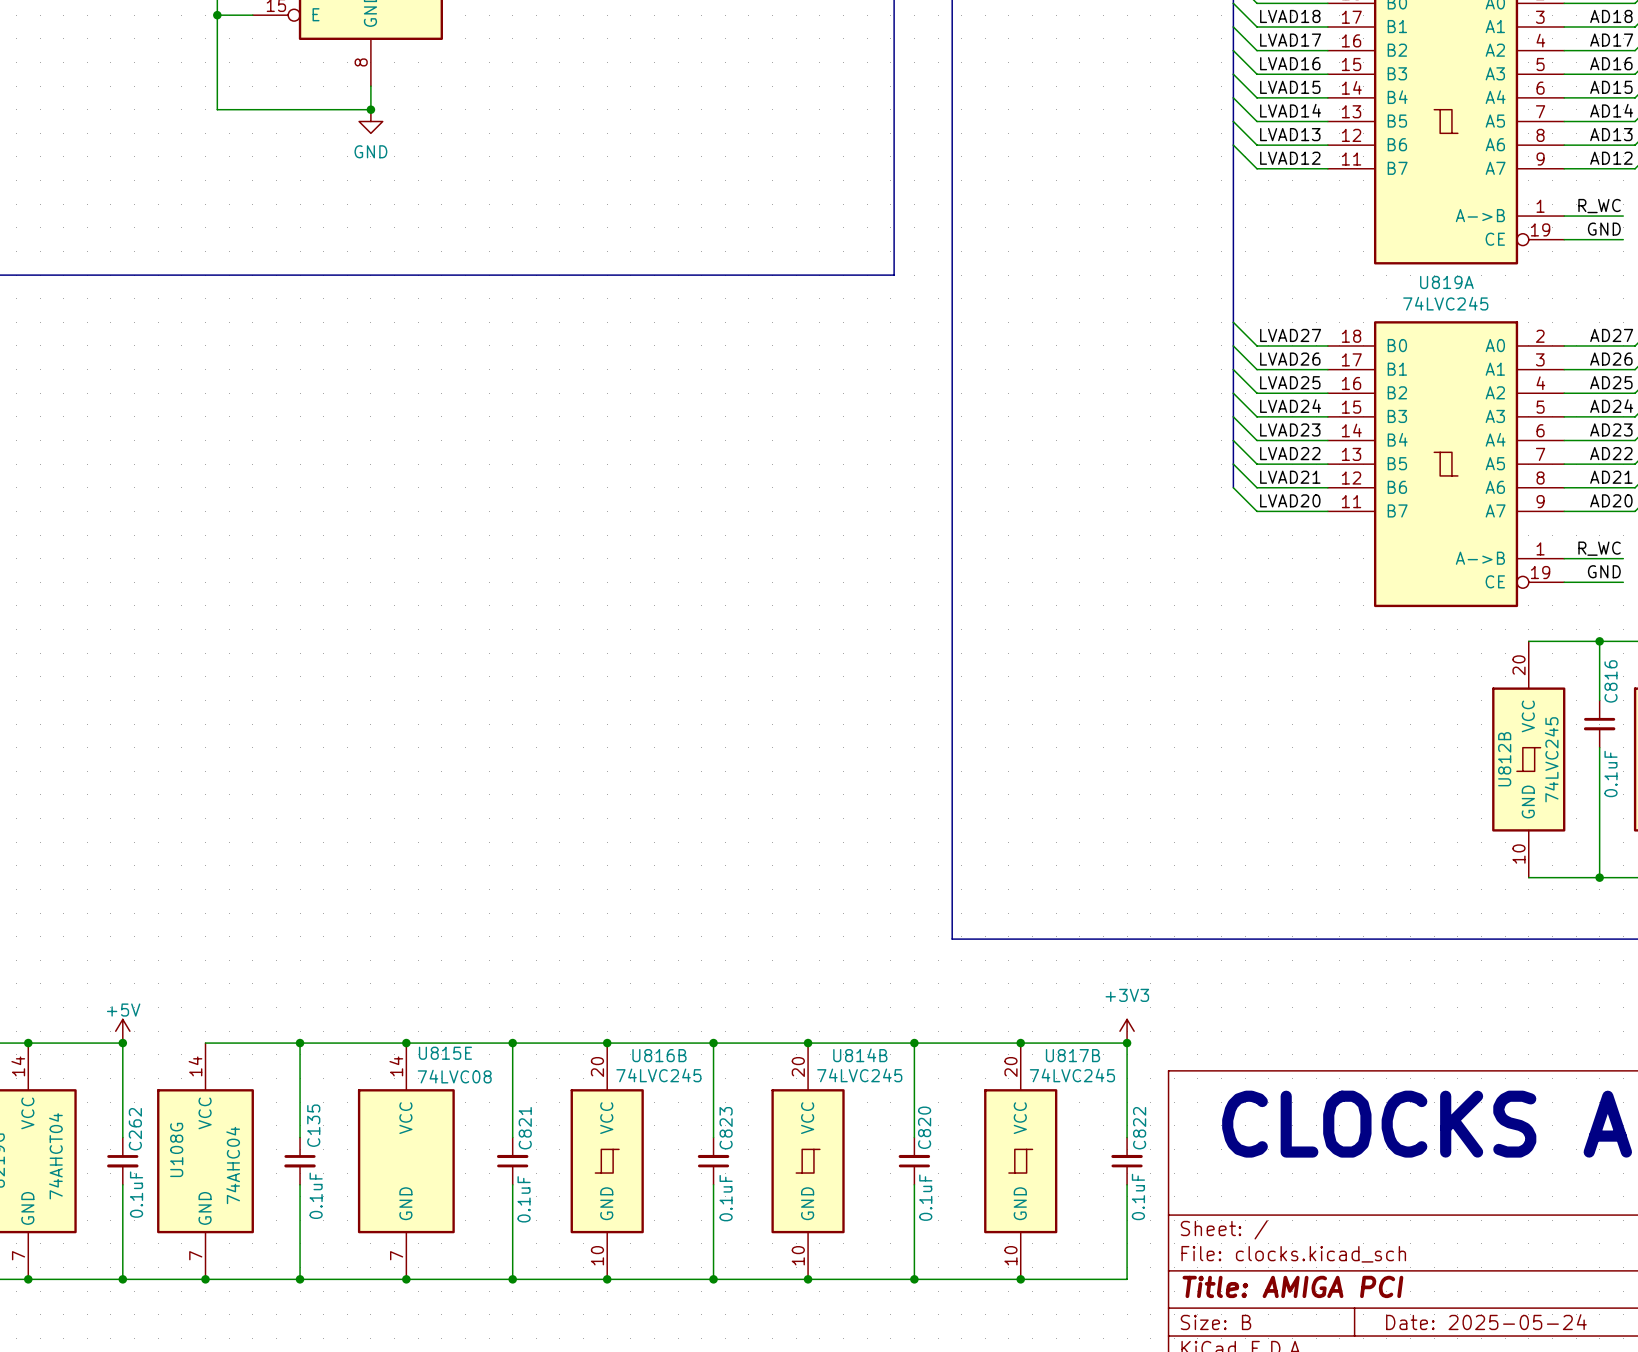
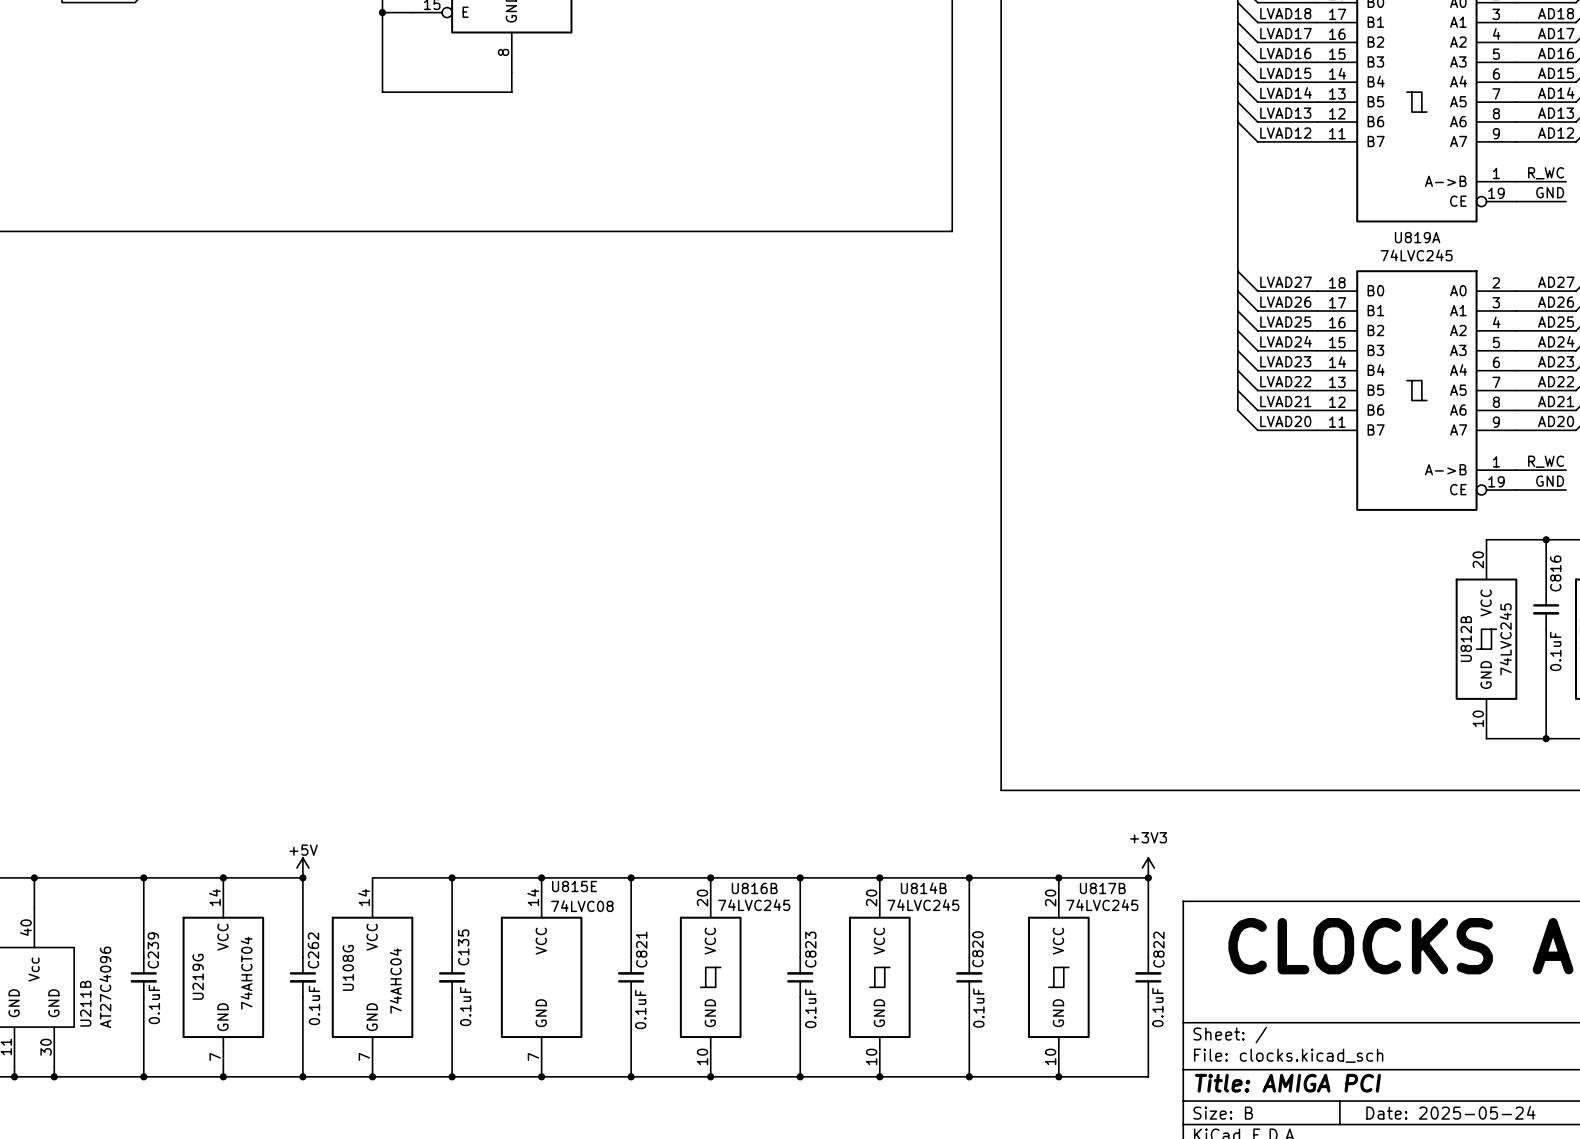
junction: (370, 109) -> none
power symbol: GND (370, 121) -> none

